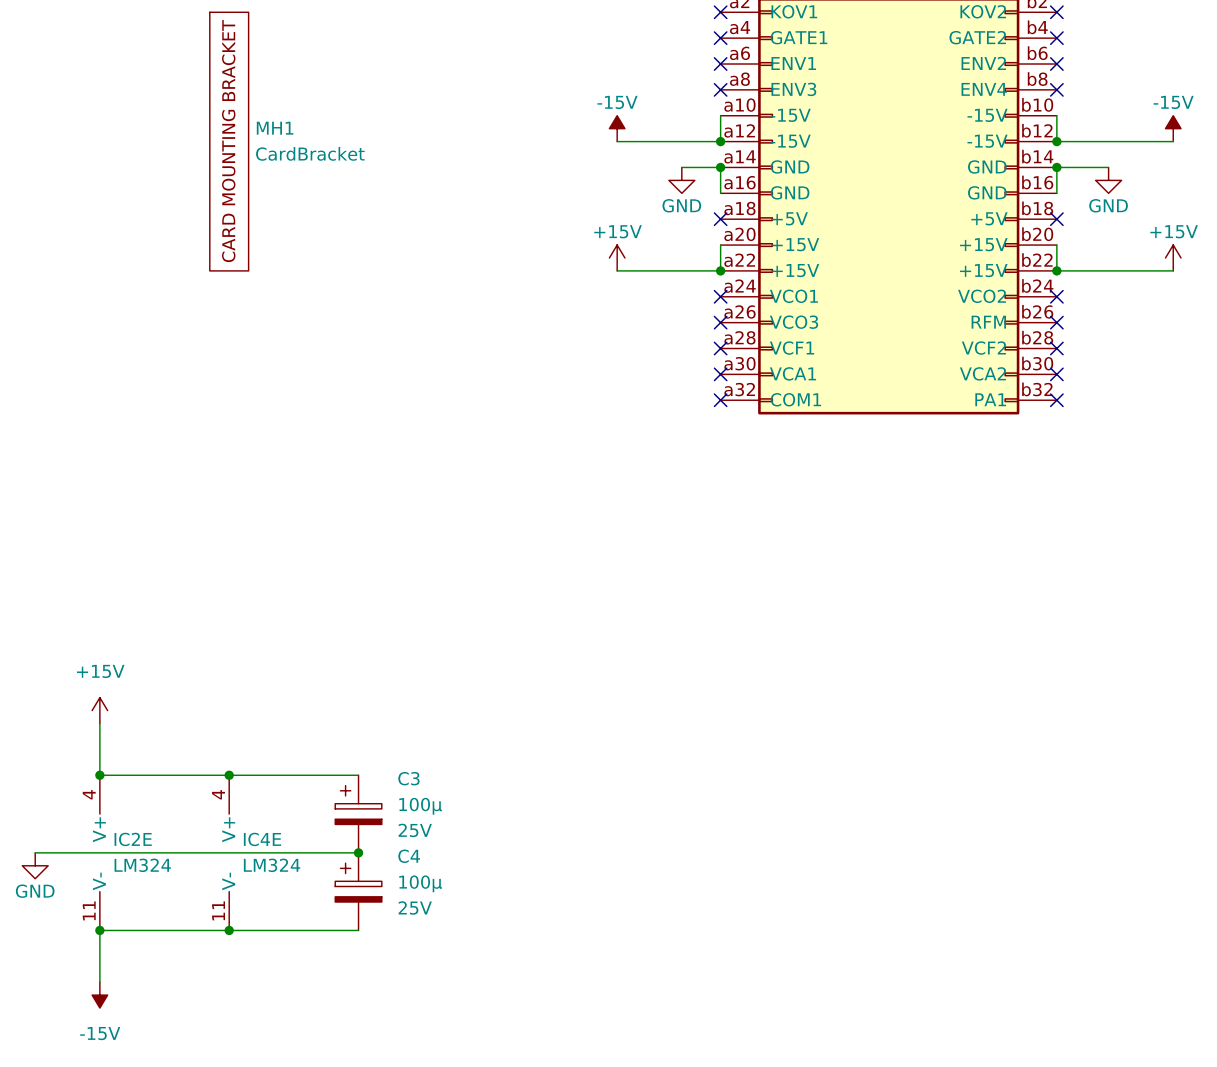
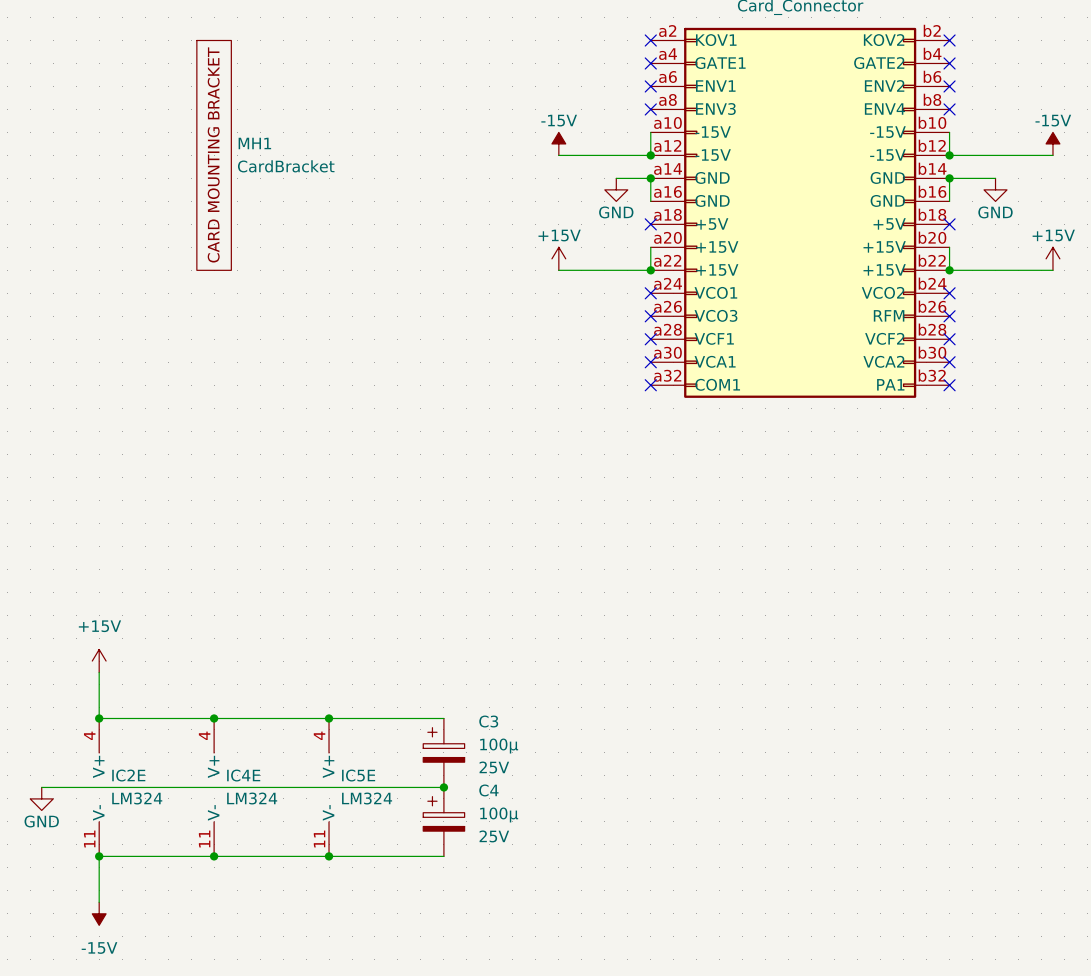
wire: none -> (329, 718) (443, 718)
junction: none -> (329, 718)
C3 position: (358, 814) -> (443, 752)
wire: none -> (329, 787) (443, 787)
junction: (358, 852) -> none
IC5E: none -> LM324 (329, 787)
junction: none -> (443, 787)
C4 position: (358, 891) -> (443, 821)
wire: none -> (329, 856) (443, 856)
junction: none -> (329, 856)

